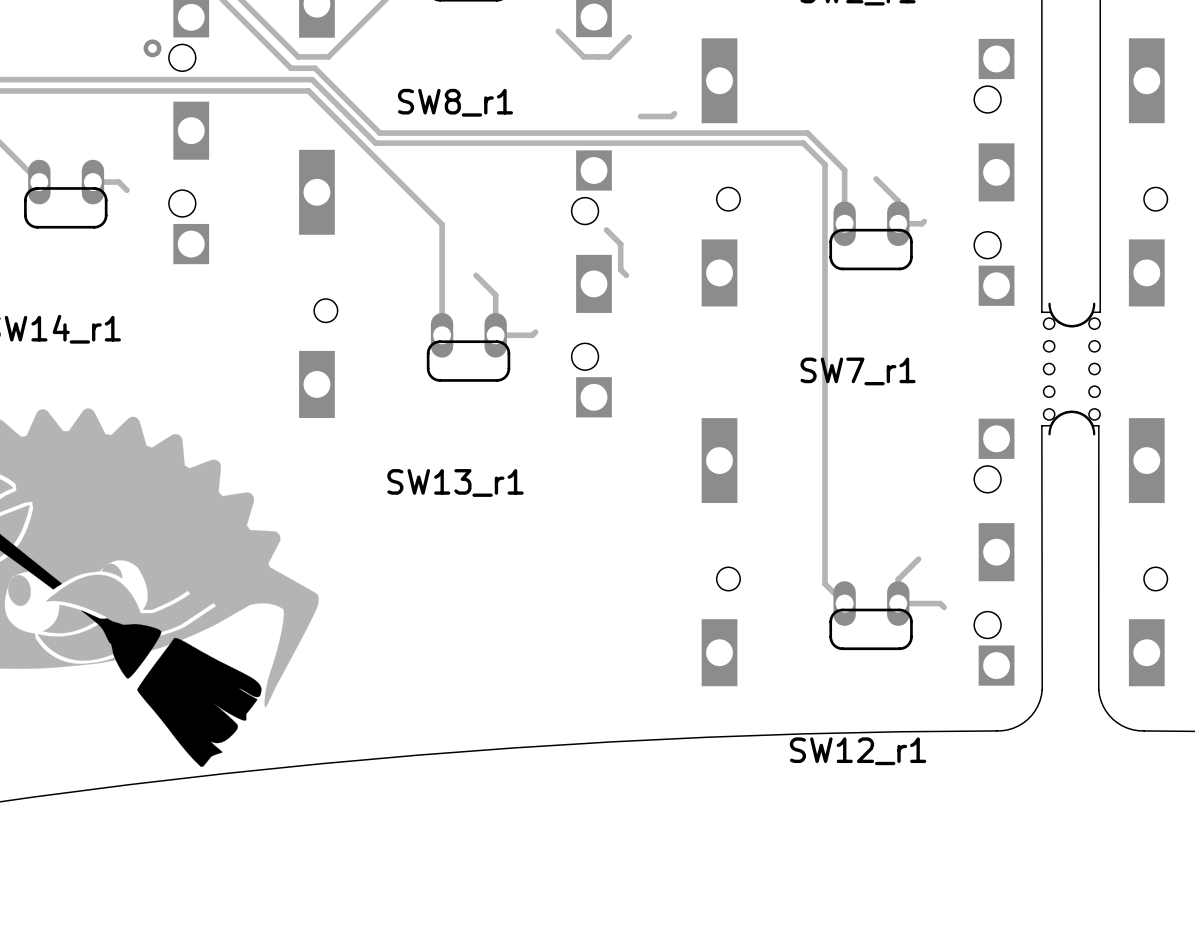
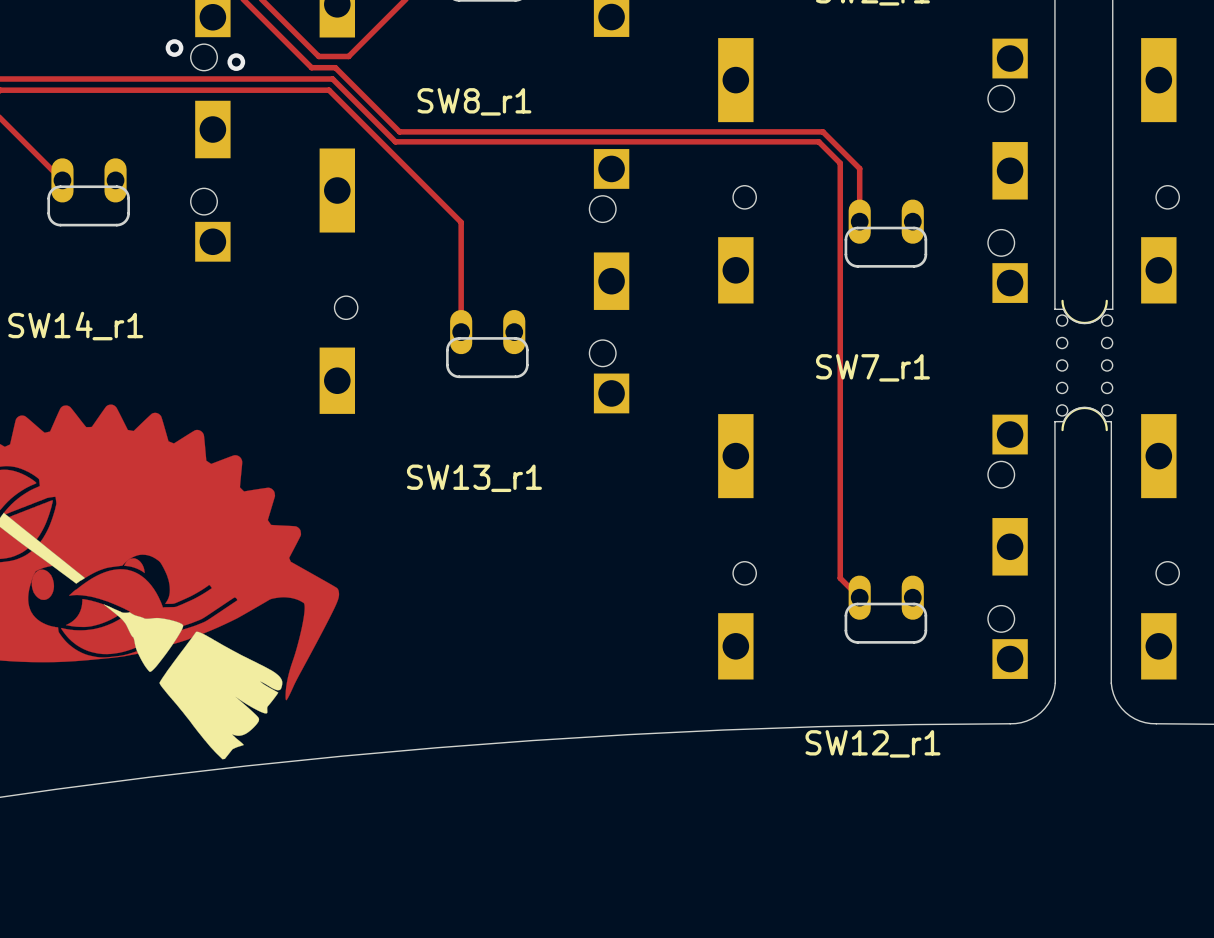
track: (558, 31) (583, 56) (609, 56) (629, 37) -> none
via: none -> (236, 62)
track: (674, 113) (671, 116) (640, 116) -> none
track: (876, 178) (898, 201) (898, 223) (922, 223) (924, 221) -> none
track: (92, 182) (118, 182) (126, 190) -> none
track: (606, 229) (620, 244) (620, 269) (626, 275) -> none
track: (475, 275) (495, 295) (495, 335) (532, 335) (535, 332) -> none
track: (918, 559) (898, 579) (898, 603) (940, 603) (944, 607) -> none

